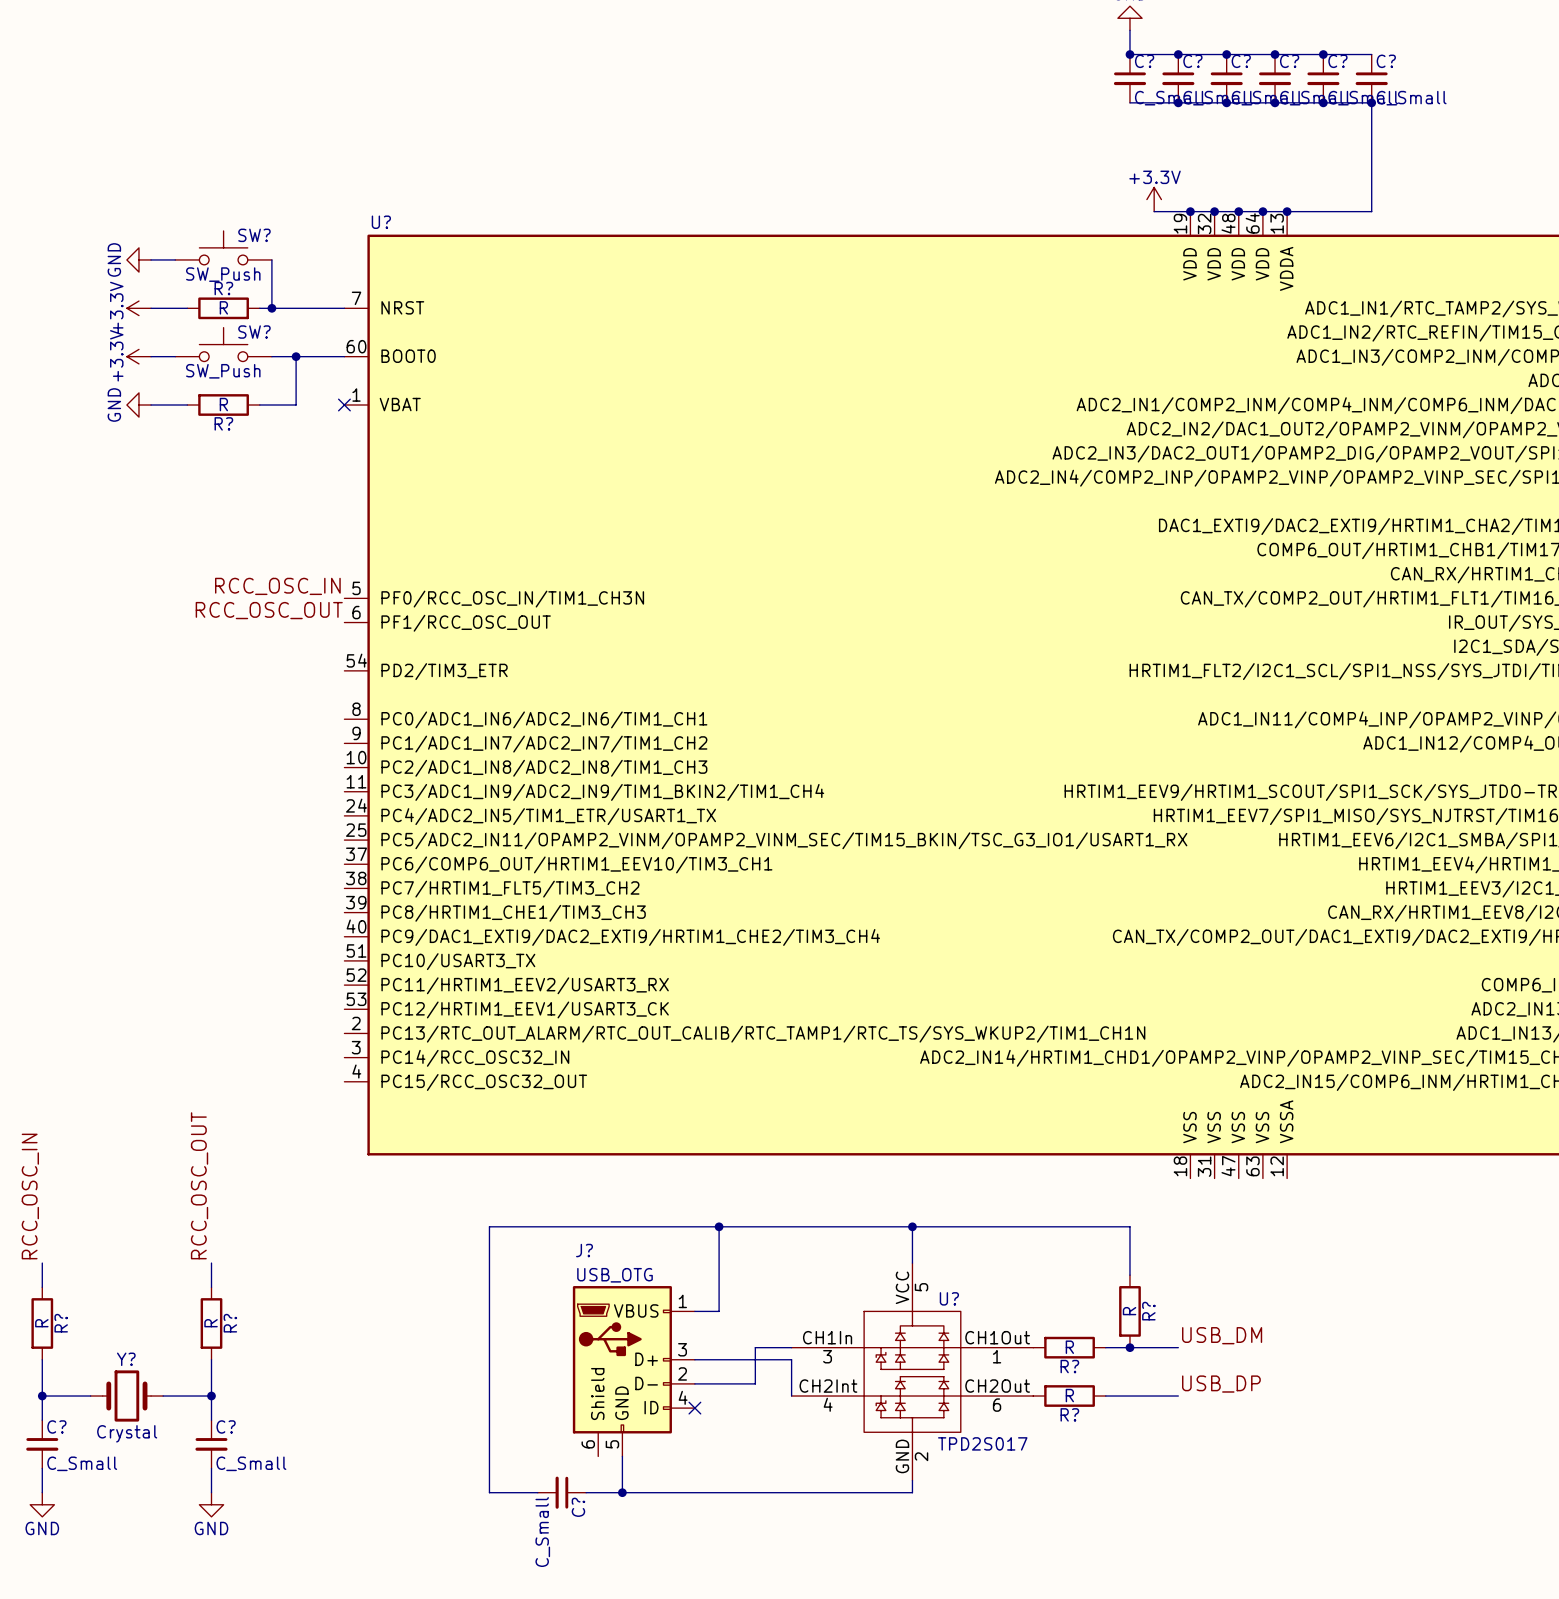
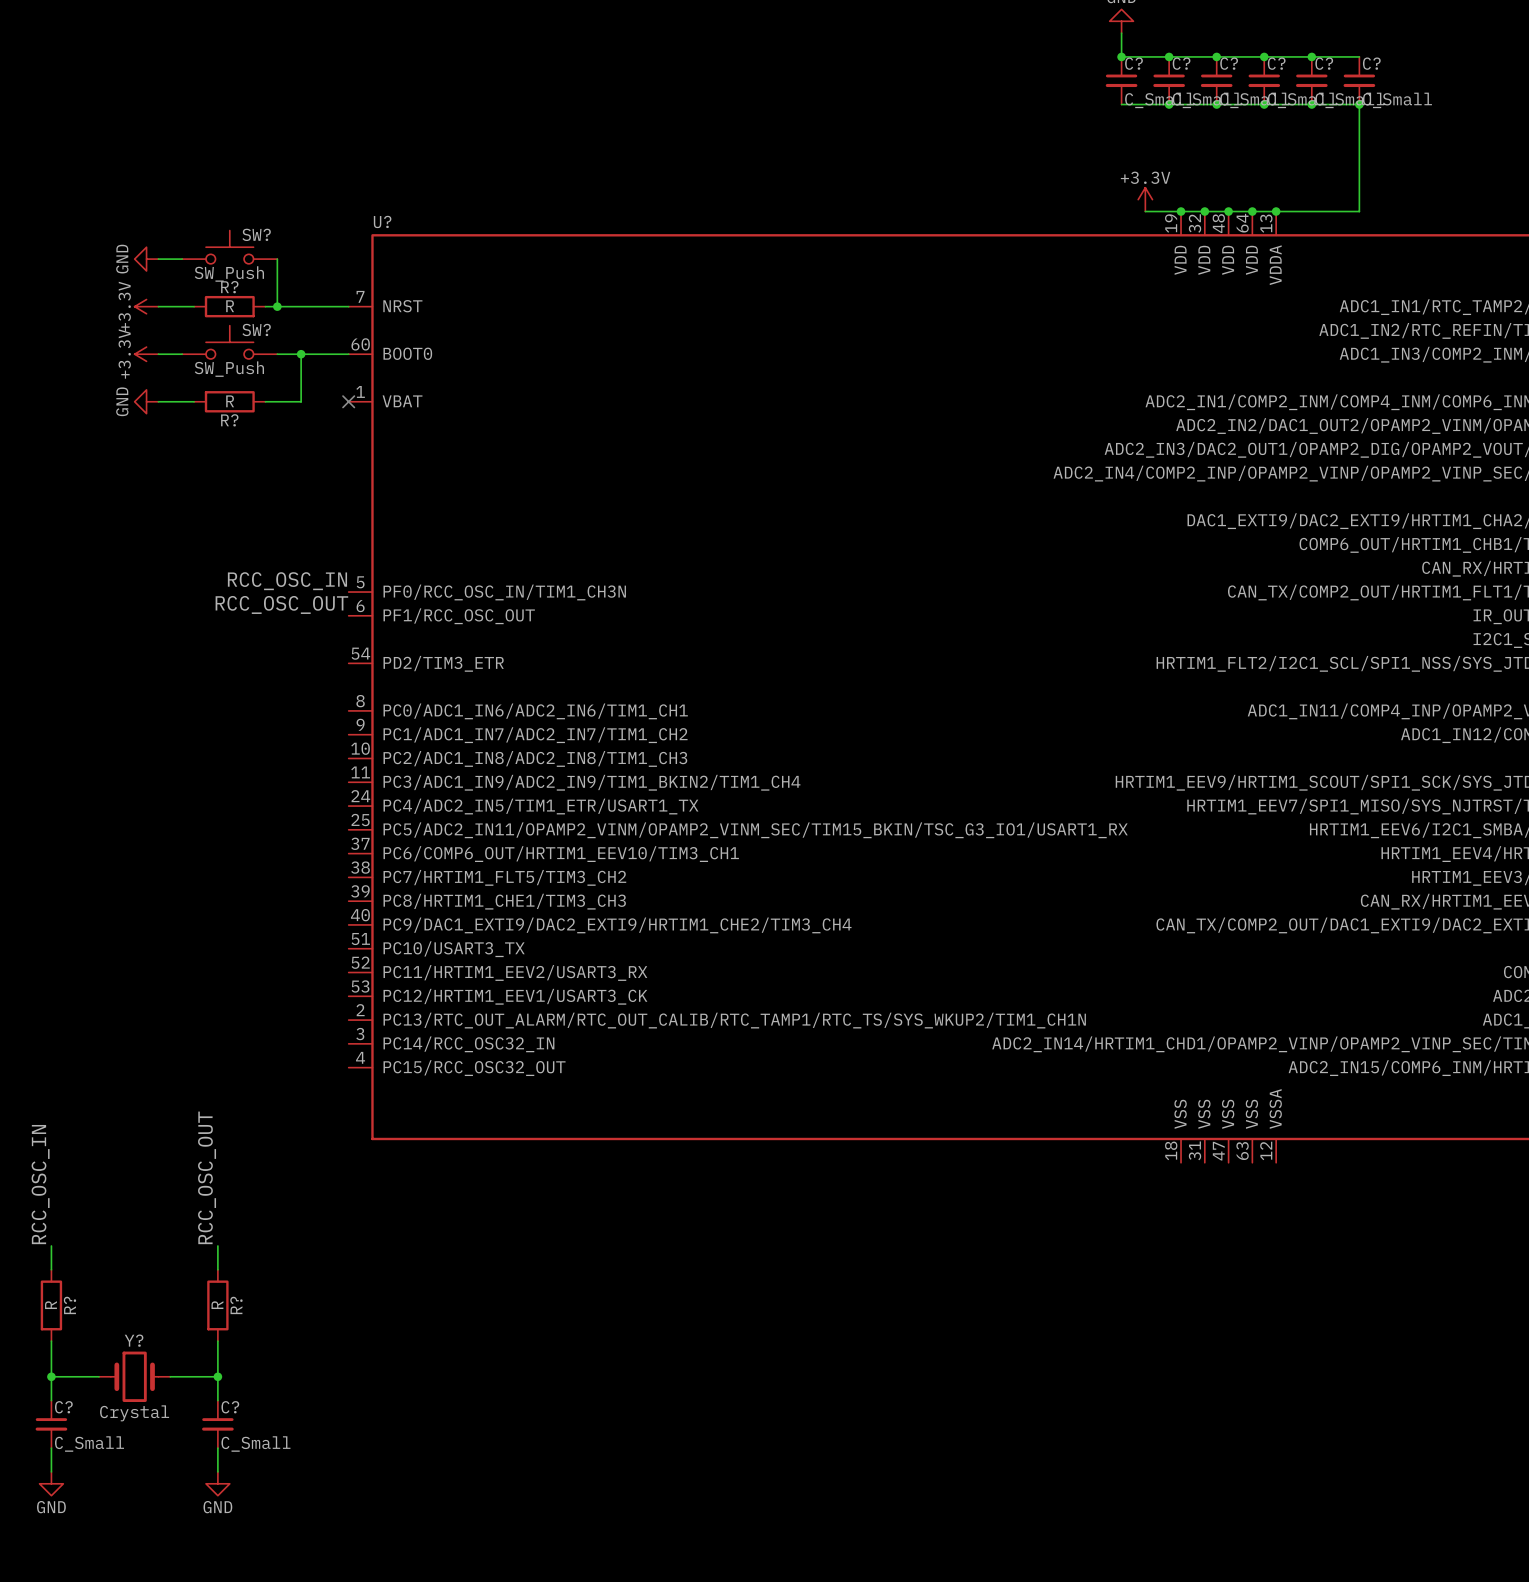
wire: (719, 1226) (719, 1311) (694, 1311) -> none
junction: (719, 1226) -> none
wire: (912, 1226) (912, 1263) -> none
junction: (912, 1226) -> none
wire: (1129, 1275) (1129, 1226) (489, 1226) (489, 1492) (537, 1492) -> none
R?: R (1129, 1311) -> none
label: USB_DM (1222, 1335) -> none
wire: (791, 1347) (755, 1347) (755, 1383) (694, 1383) -> none
R?: R (1069, 1347) -> none
wire: (1105, 1347) (1178, 1347) -> none
junction: (1129, 1347) -> none
wire: (694, 1359) (791, 1359) (791, 1396) -> none
J?: USB_OTG (633, 1371) -> none
U?: TPD2S017 (912, 1371) -> none
label: USB_DP (1221, 1384) -> none
R?: R (1069, 1396) -> none
wire: (1105, 1396) (1178, 1396) -> none
no-connect mark: (694, 1408) -> none
wire: (622, 1456) (622, 1492) -> none
wire: (912, 1480) (912, 1492) (586, 1492) -> none
C?: C_Small (561, 1492) -> none
junction: (622, 1492) -> none

